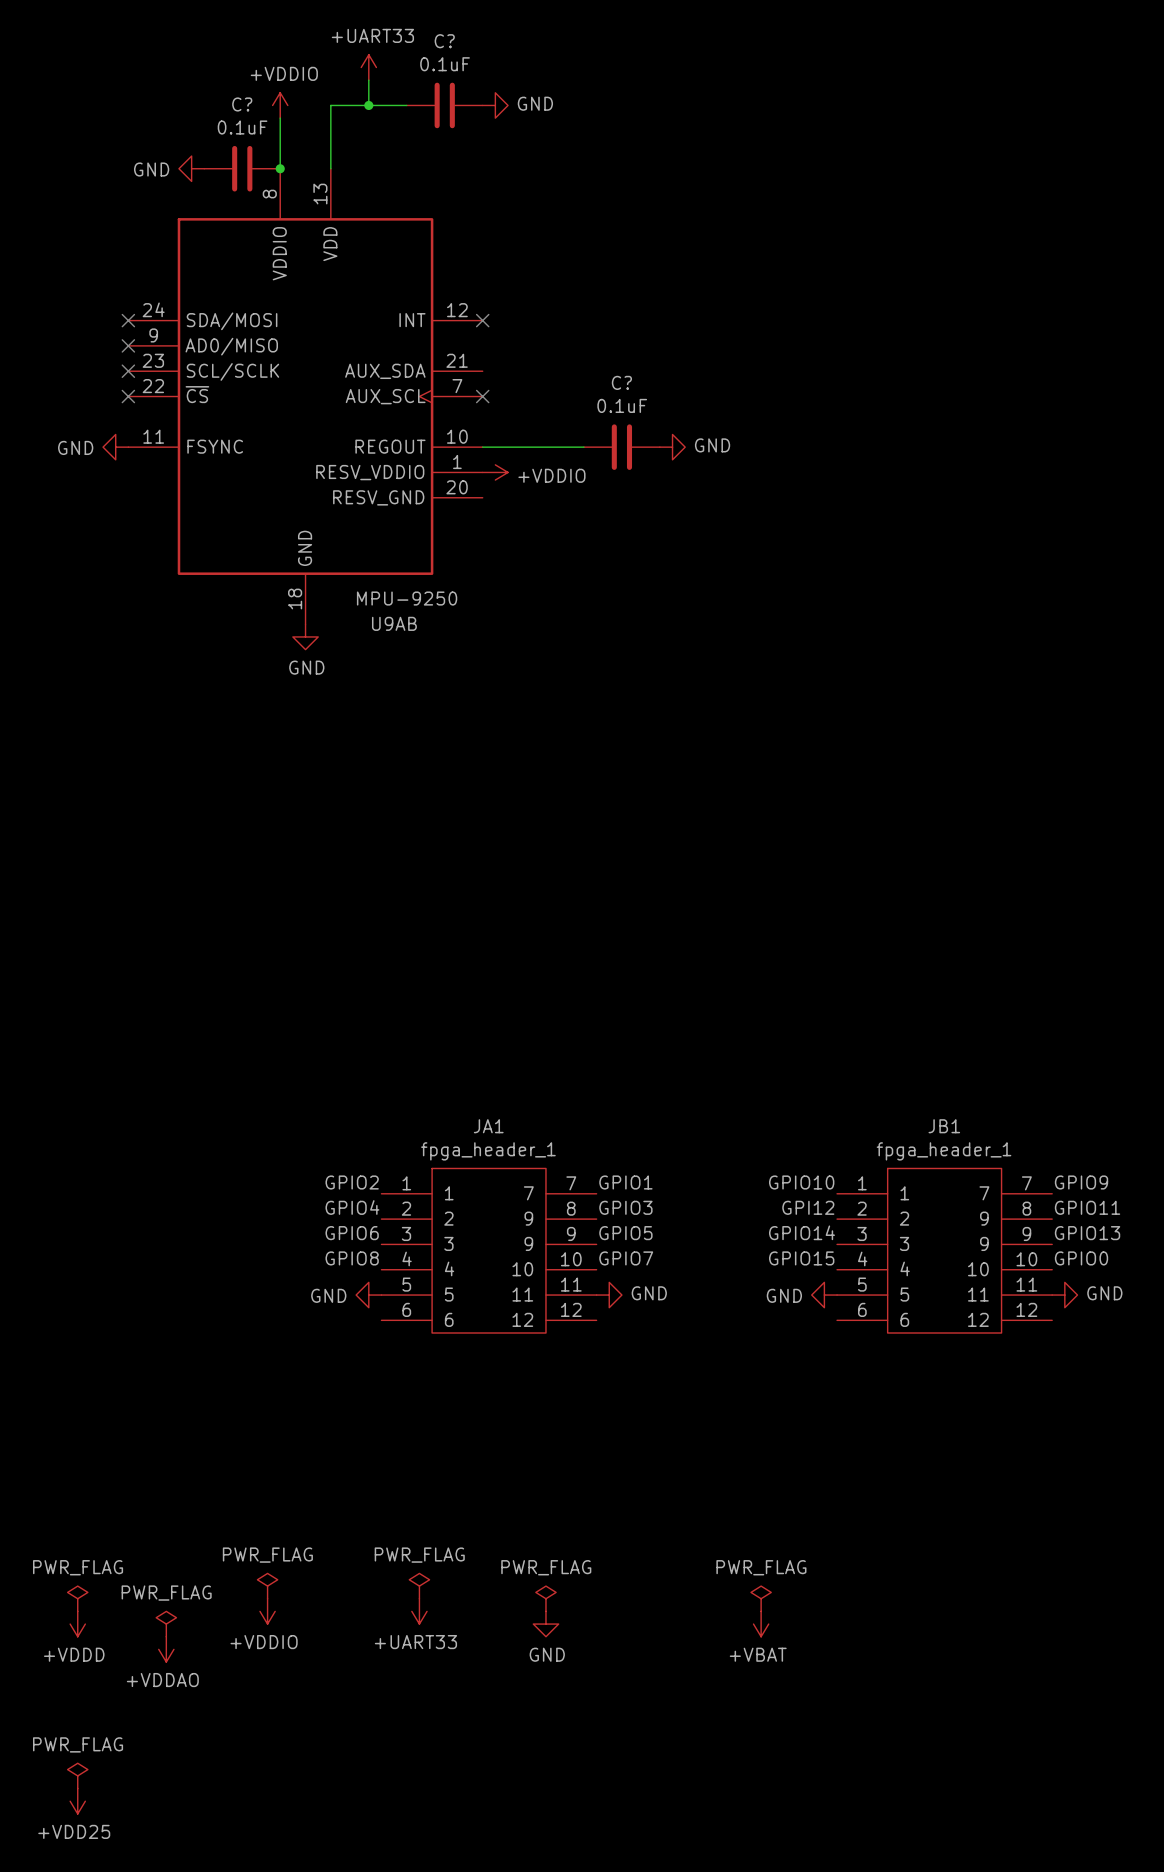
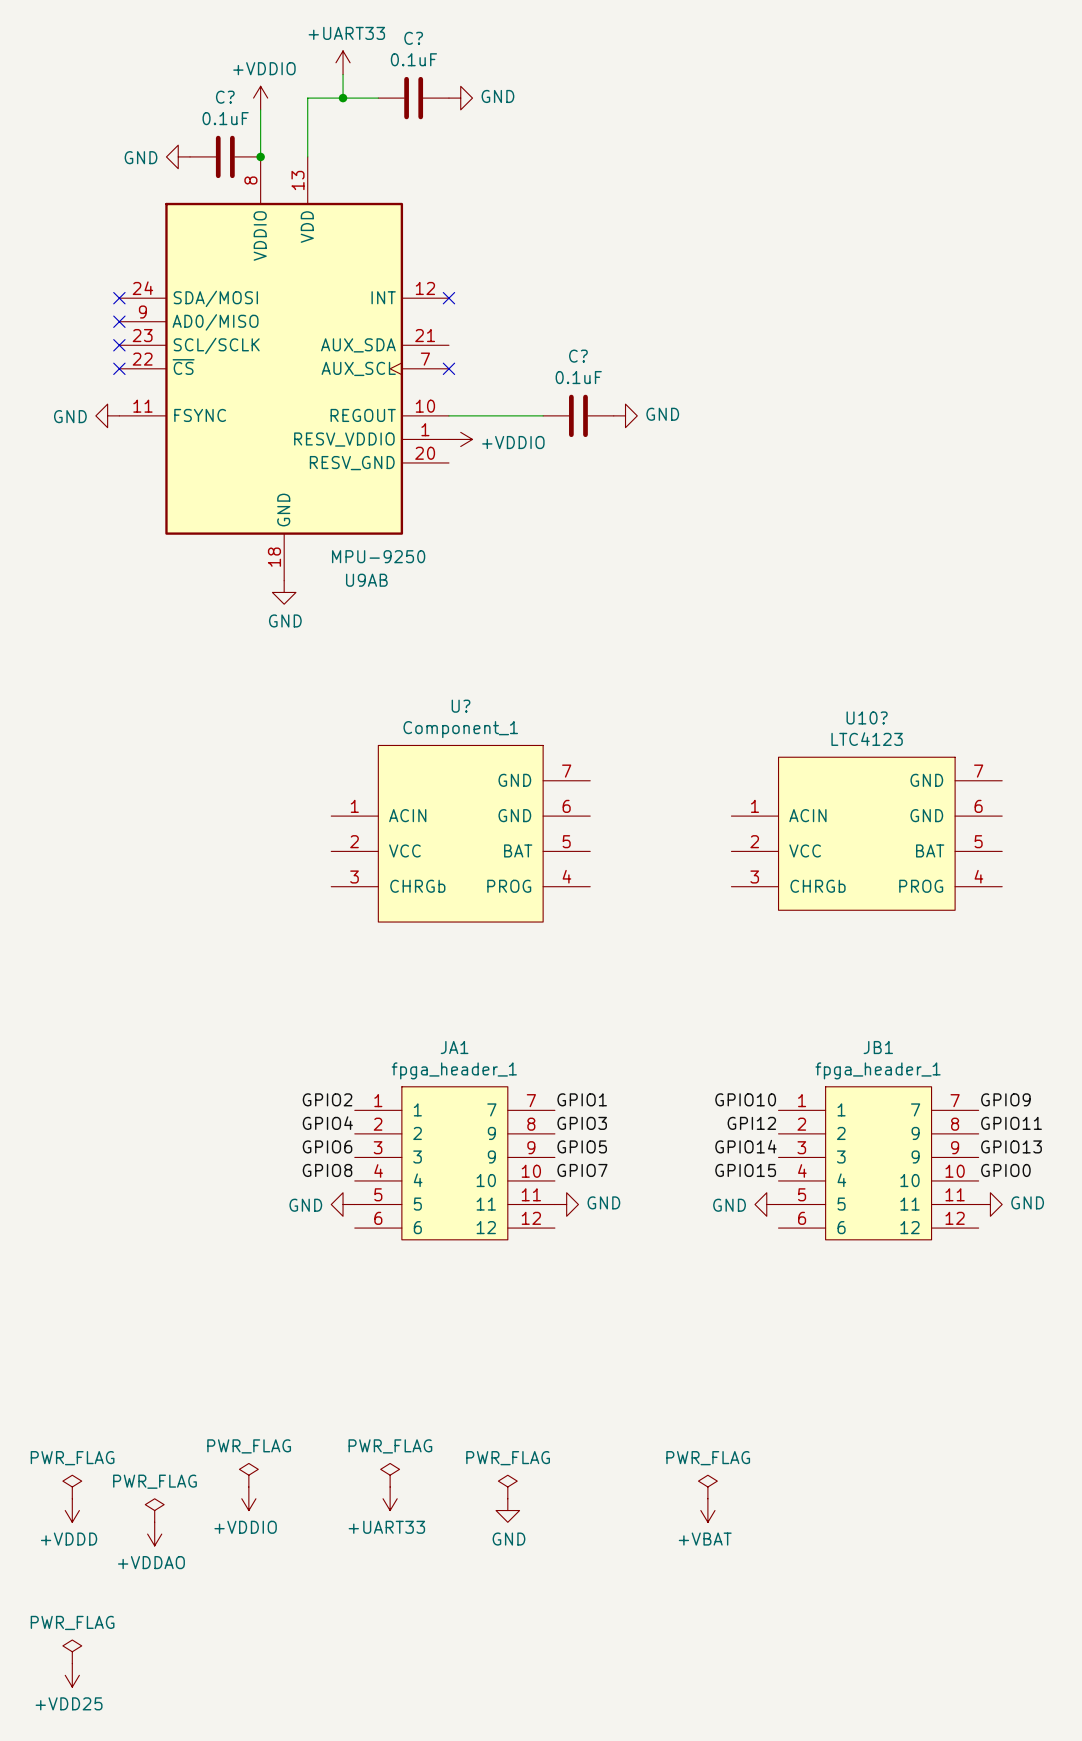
U?: none -> Component_1 (460, 833)
U10?: none -> LTC4123 (866, 833)

